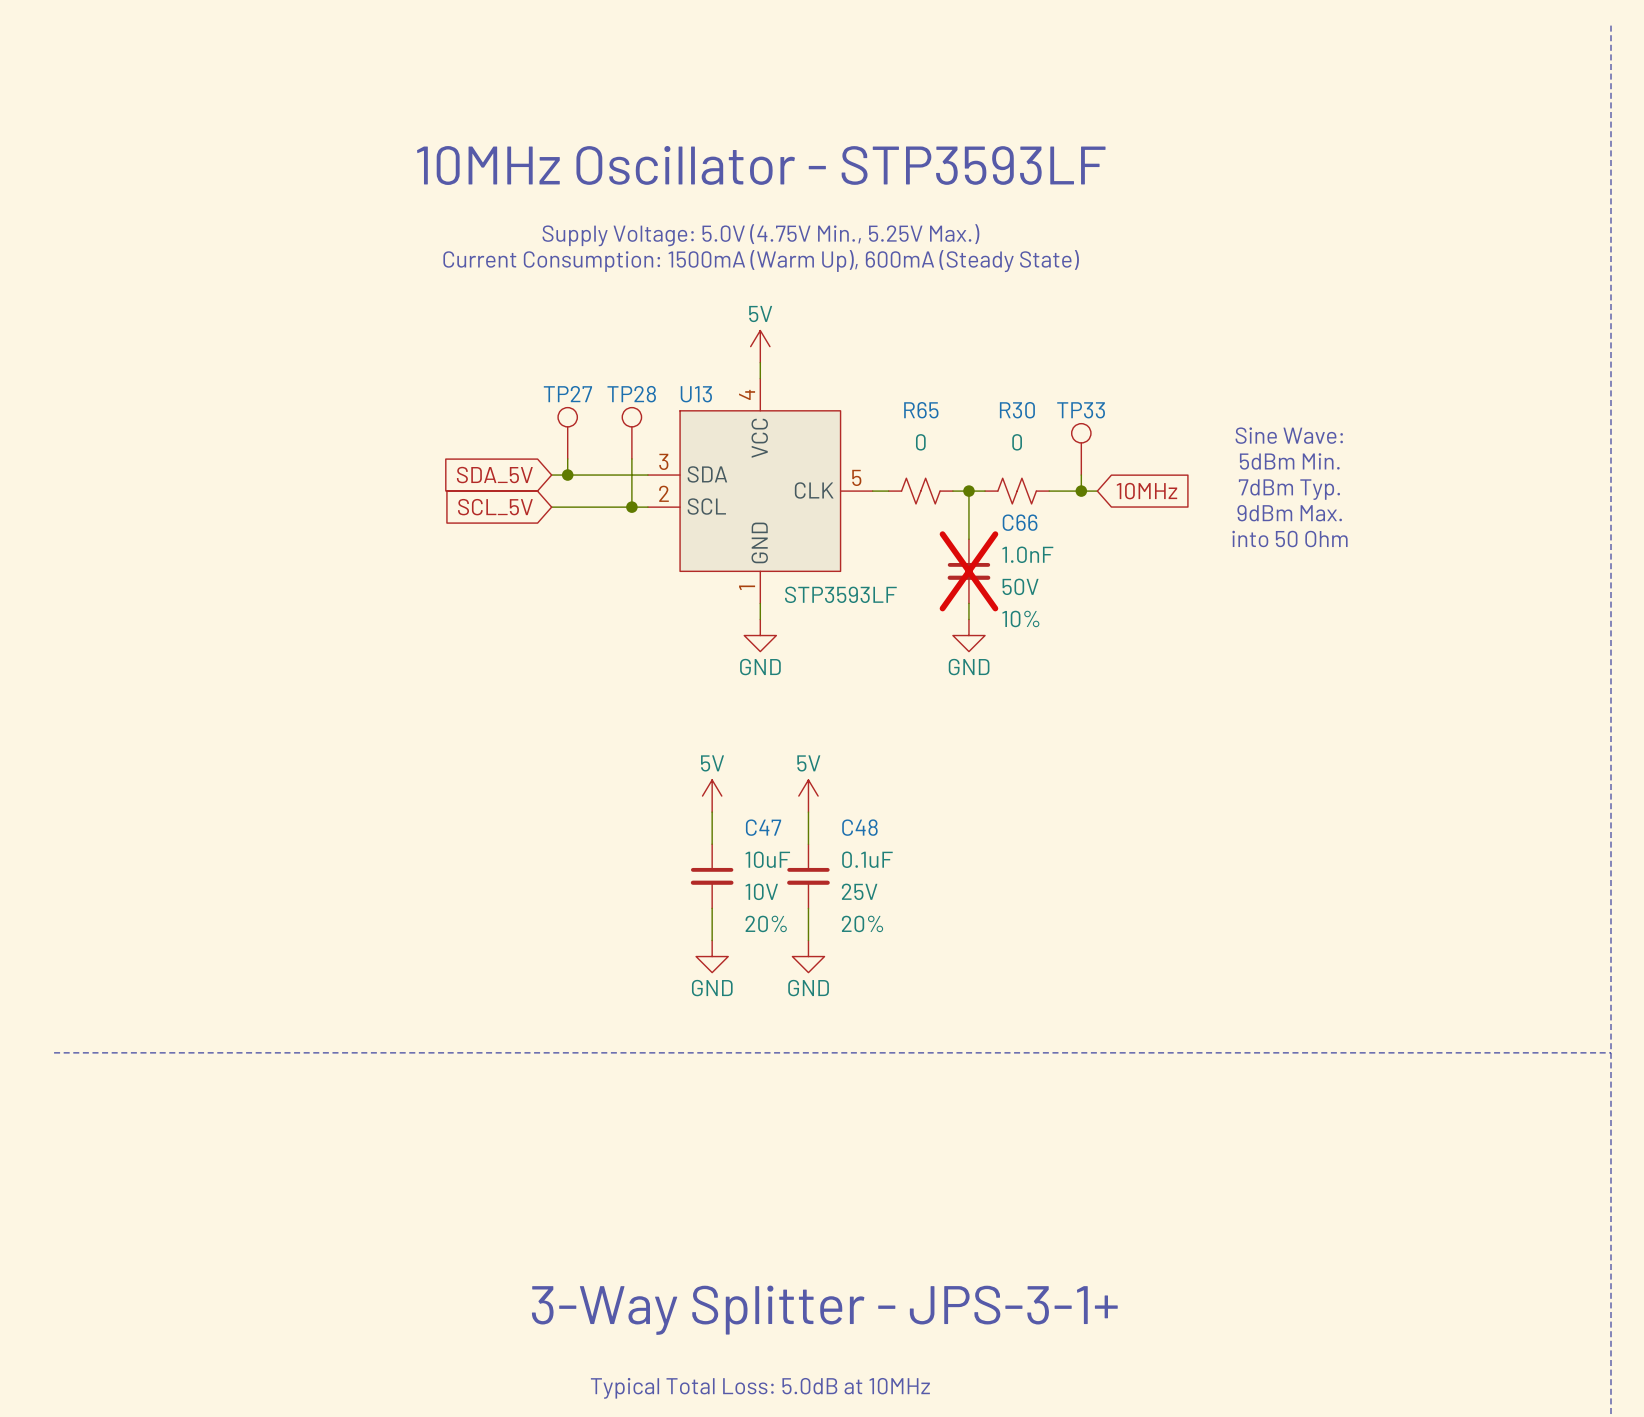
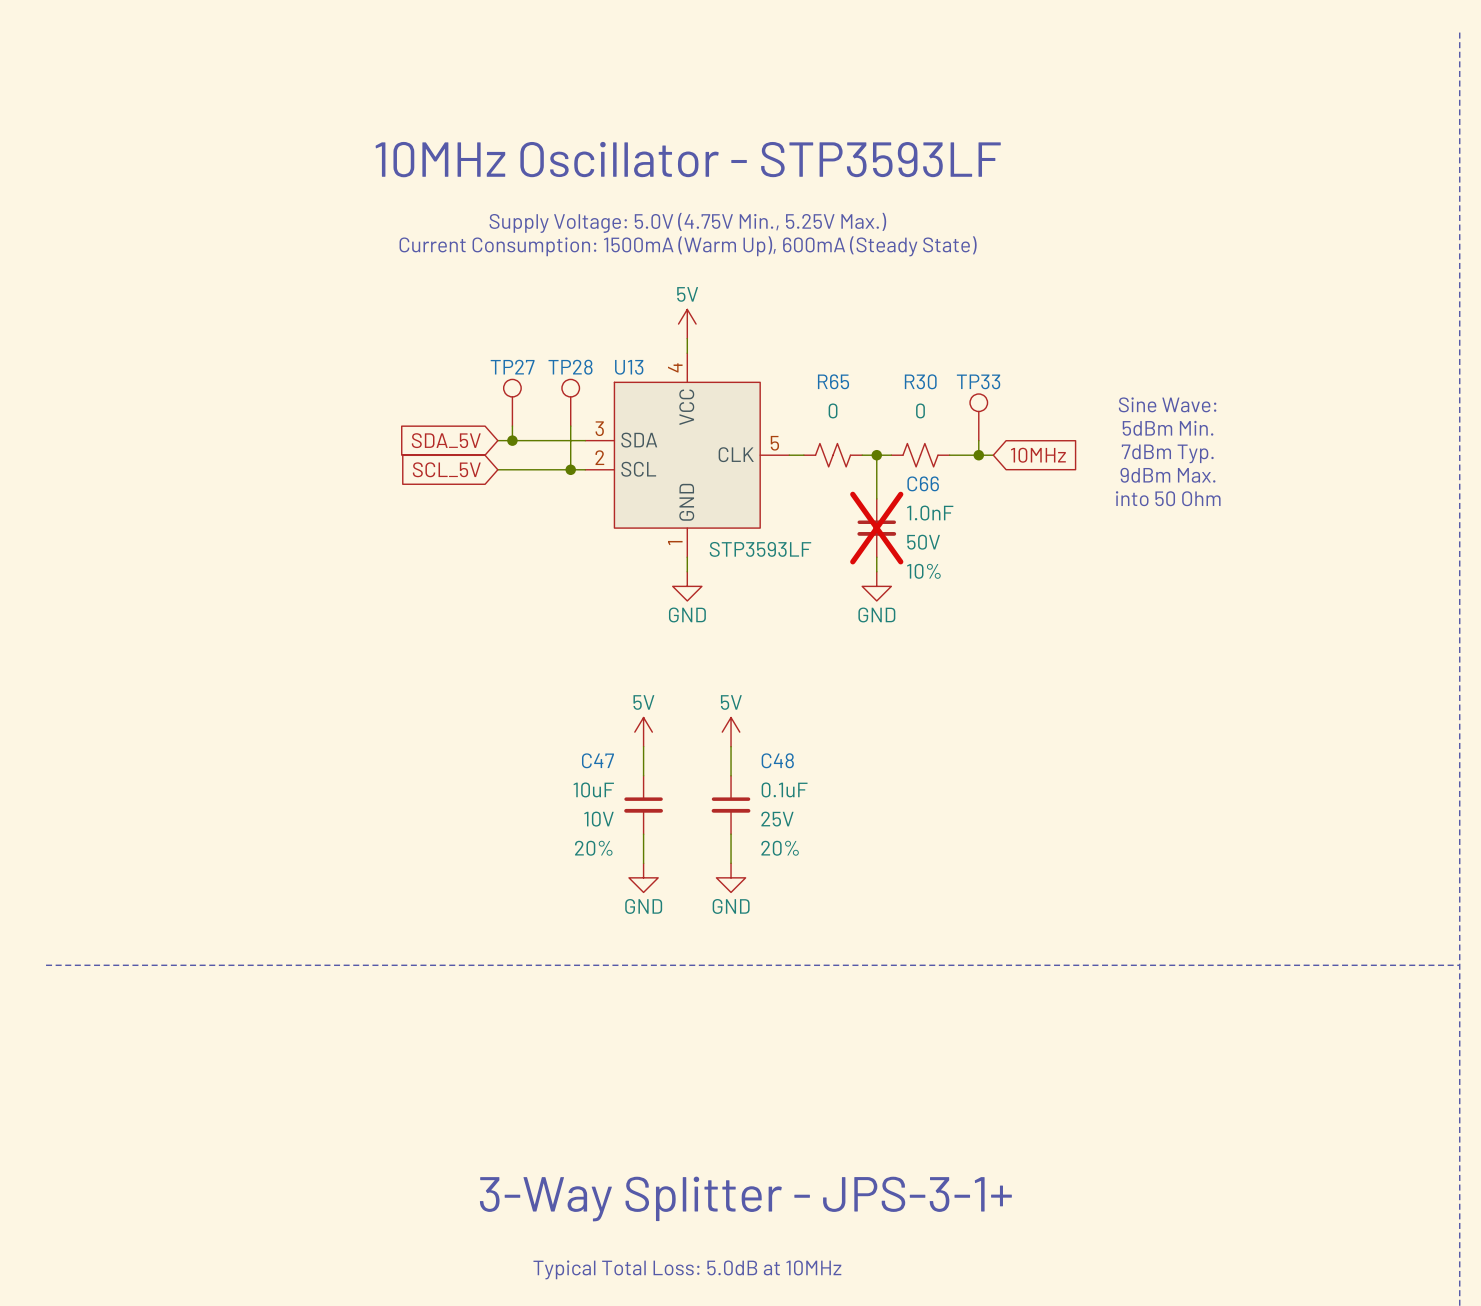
C47 name position: C47 (763, 827) -> C47 (597, 760)
C47 value position: 10uF (767, 859) -> 10uF (593, 789)
C47 text position: 10V (761, 891) -> 10V (599, 819)
C47 text position: 20% (766, 923) -> 20% (593, 848)

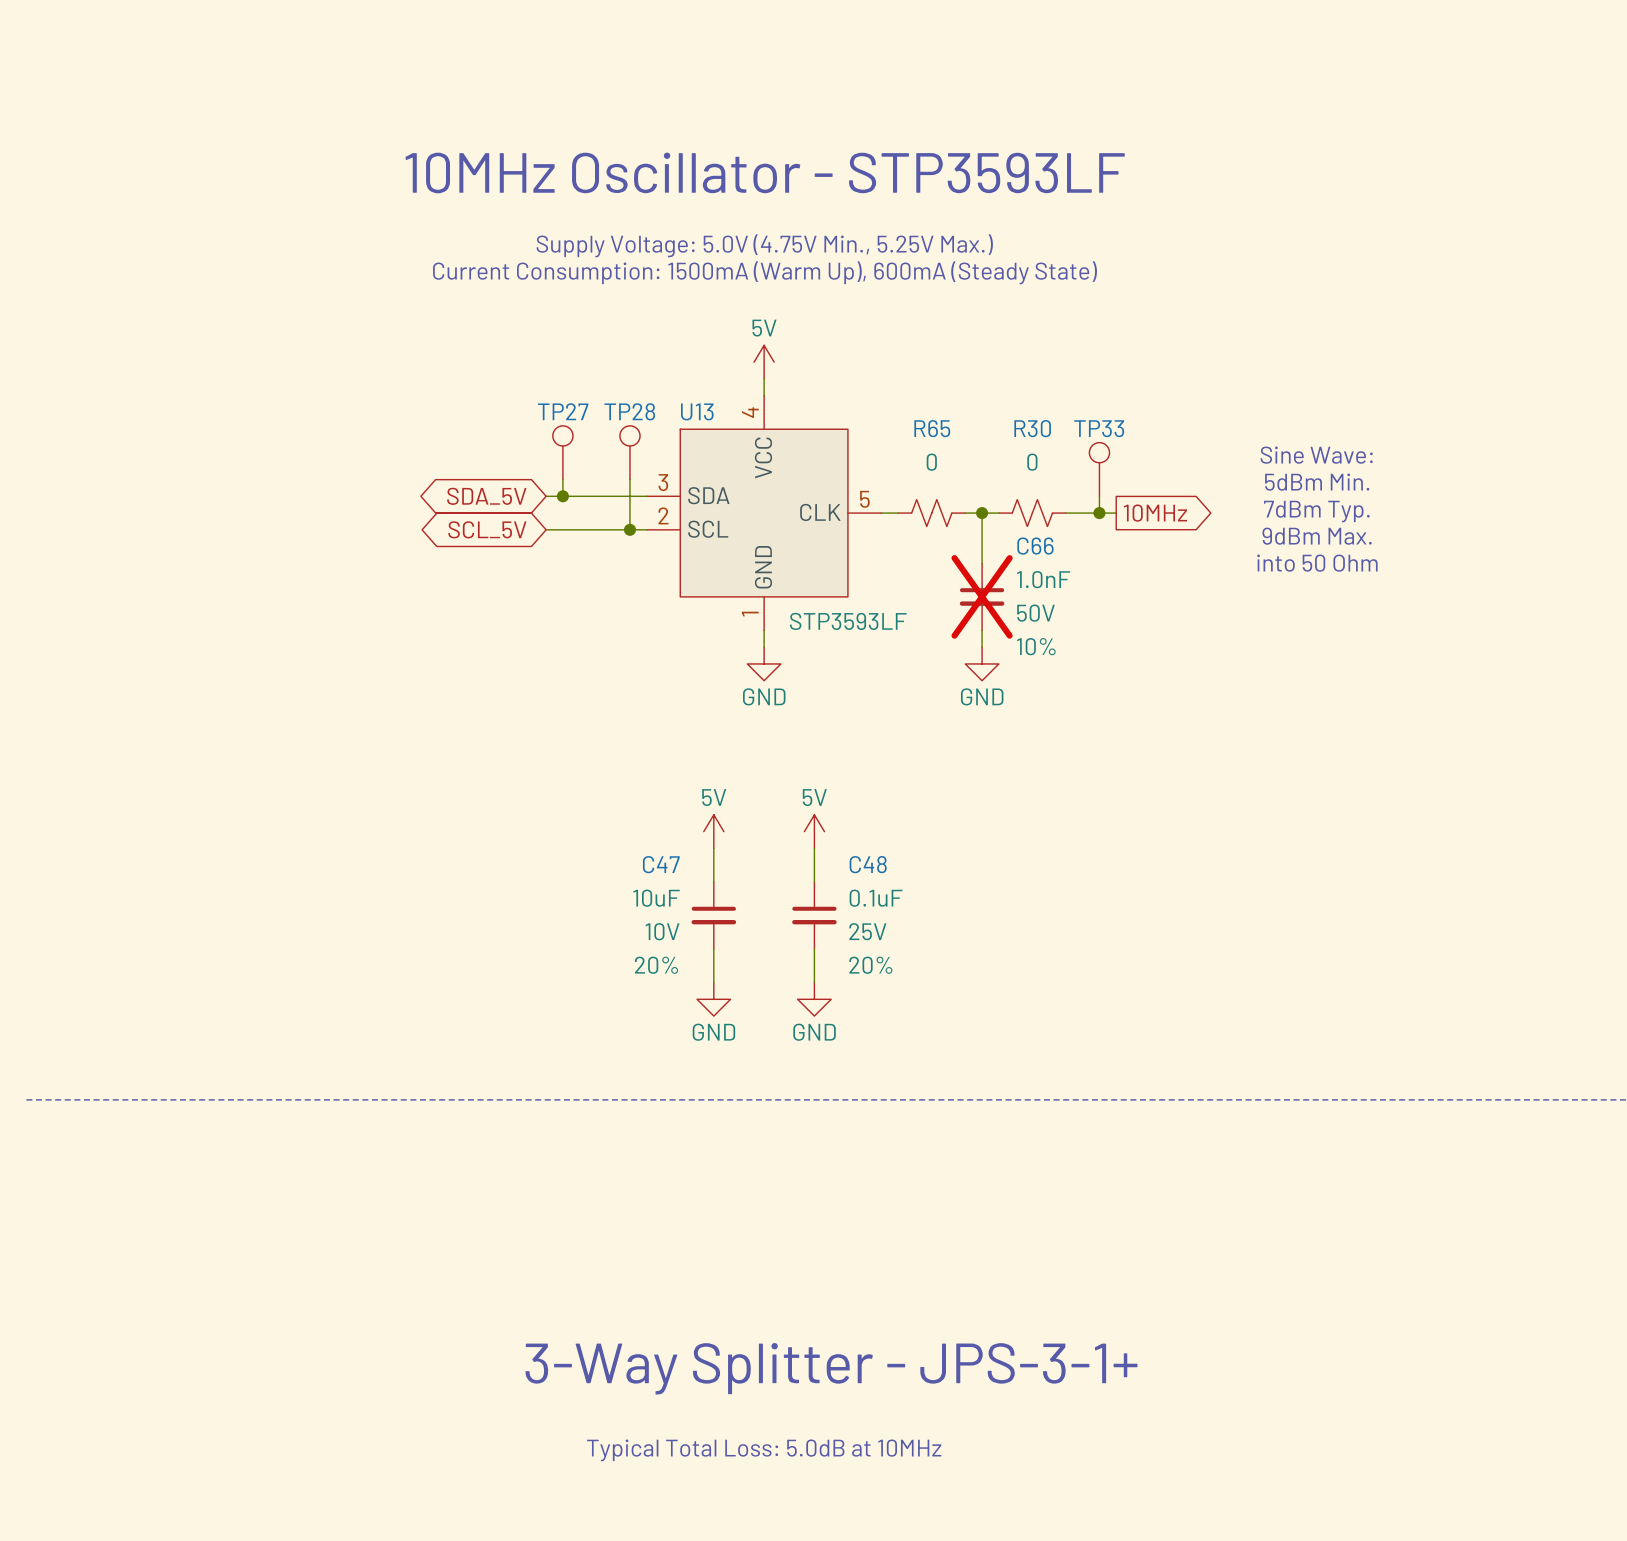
global label shape: input (446, 440) -> bidirectional (486, 496)
global label shape: input (1038, 455) -> output (1155, 513)
global label shape: input (446, 469) -> bidirectional (487, 529)

